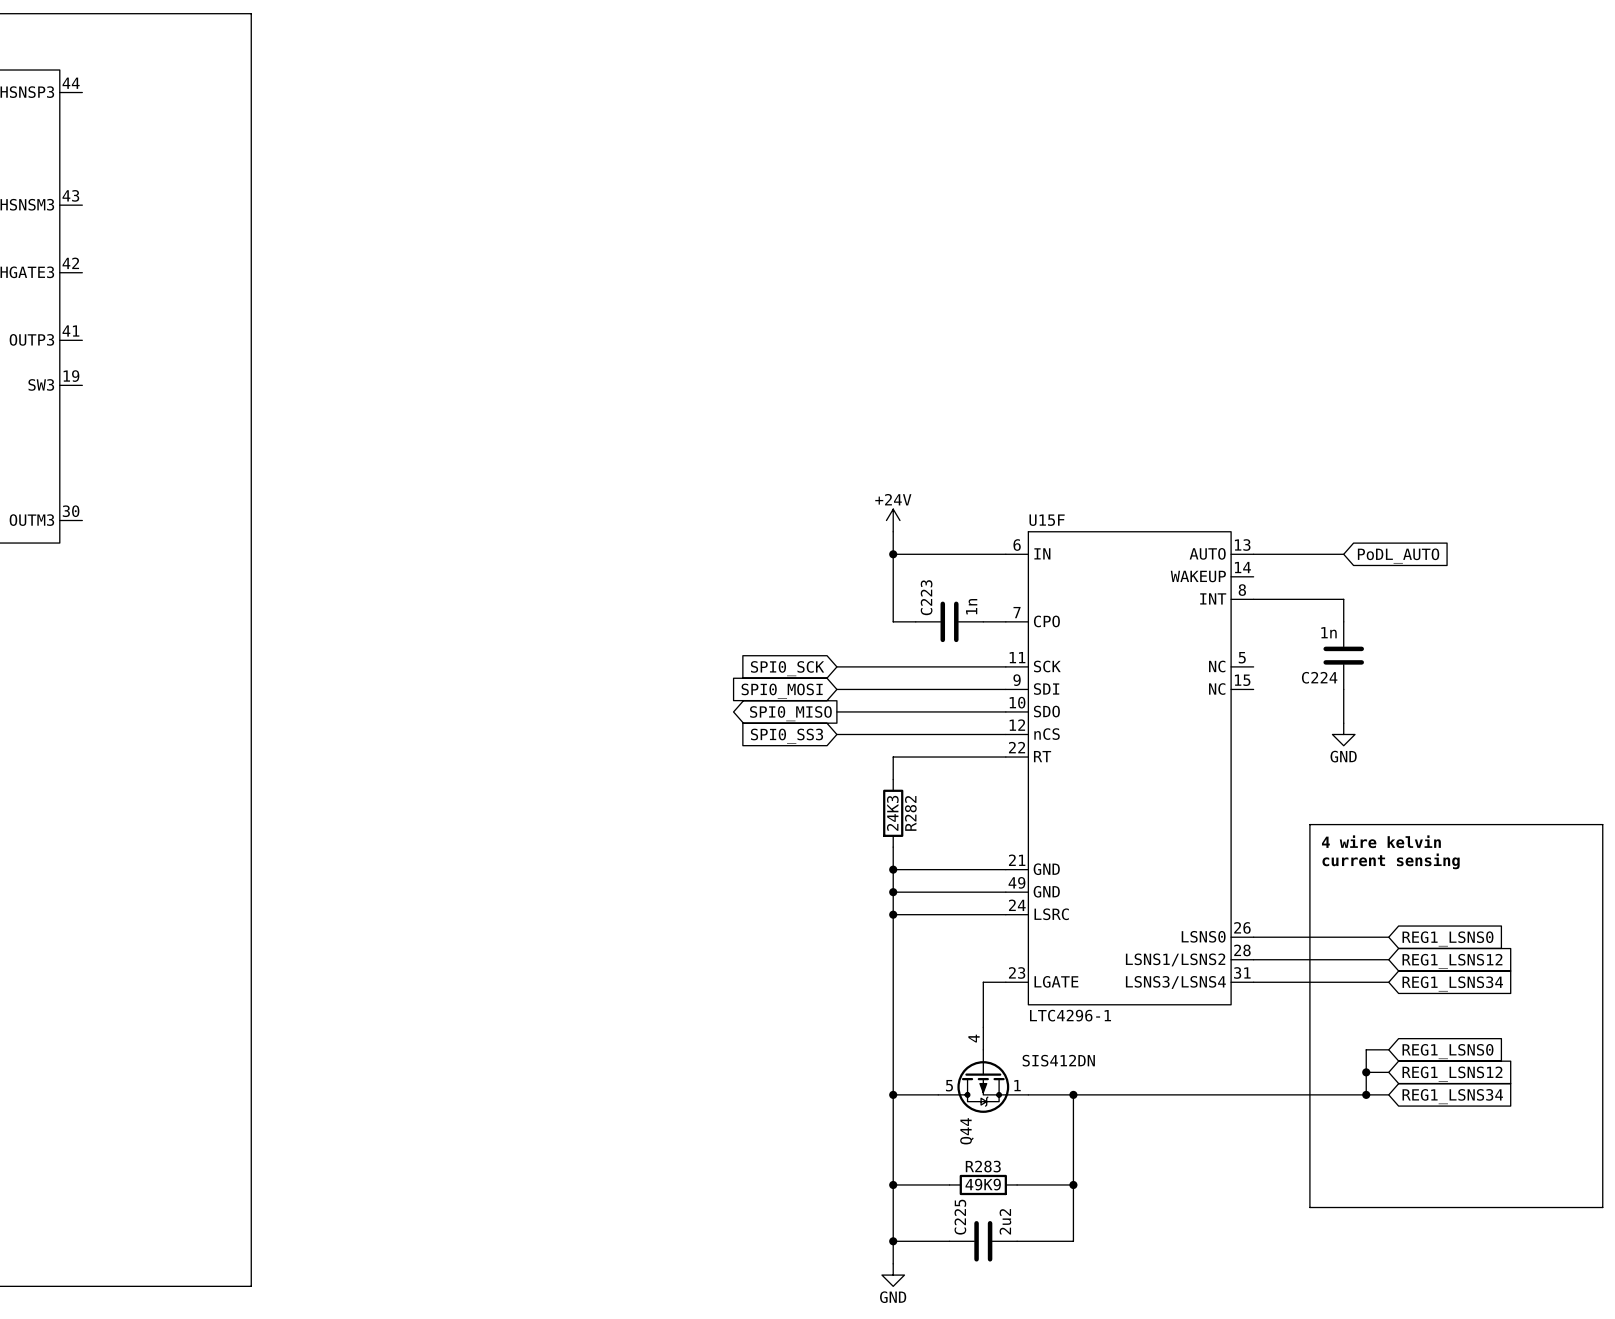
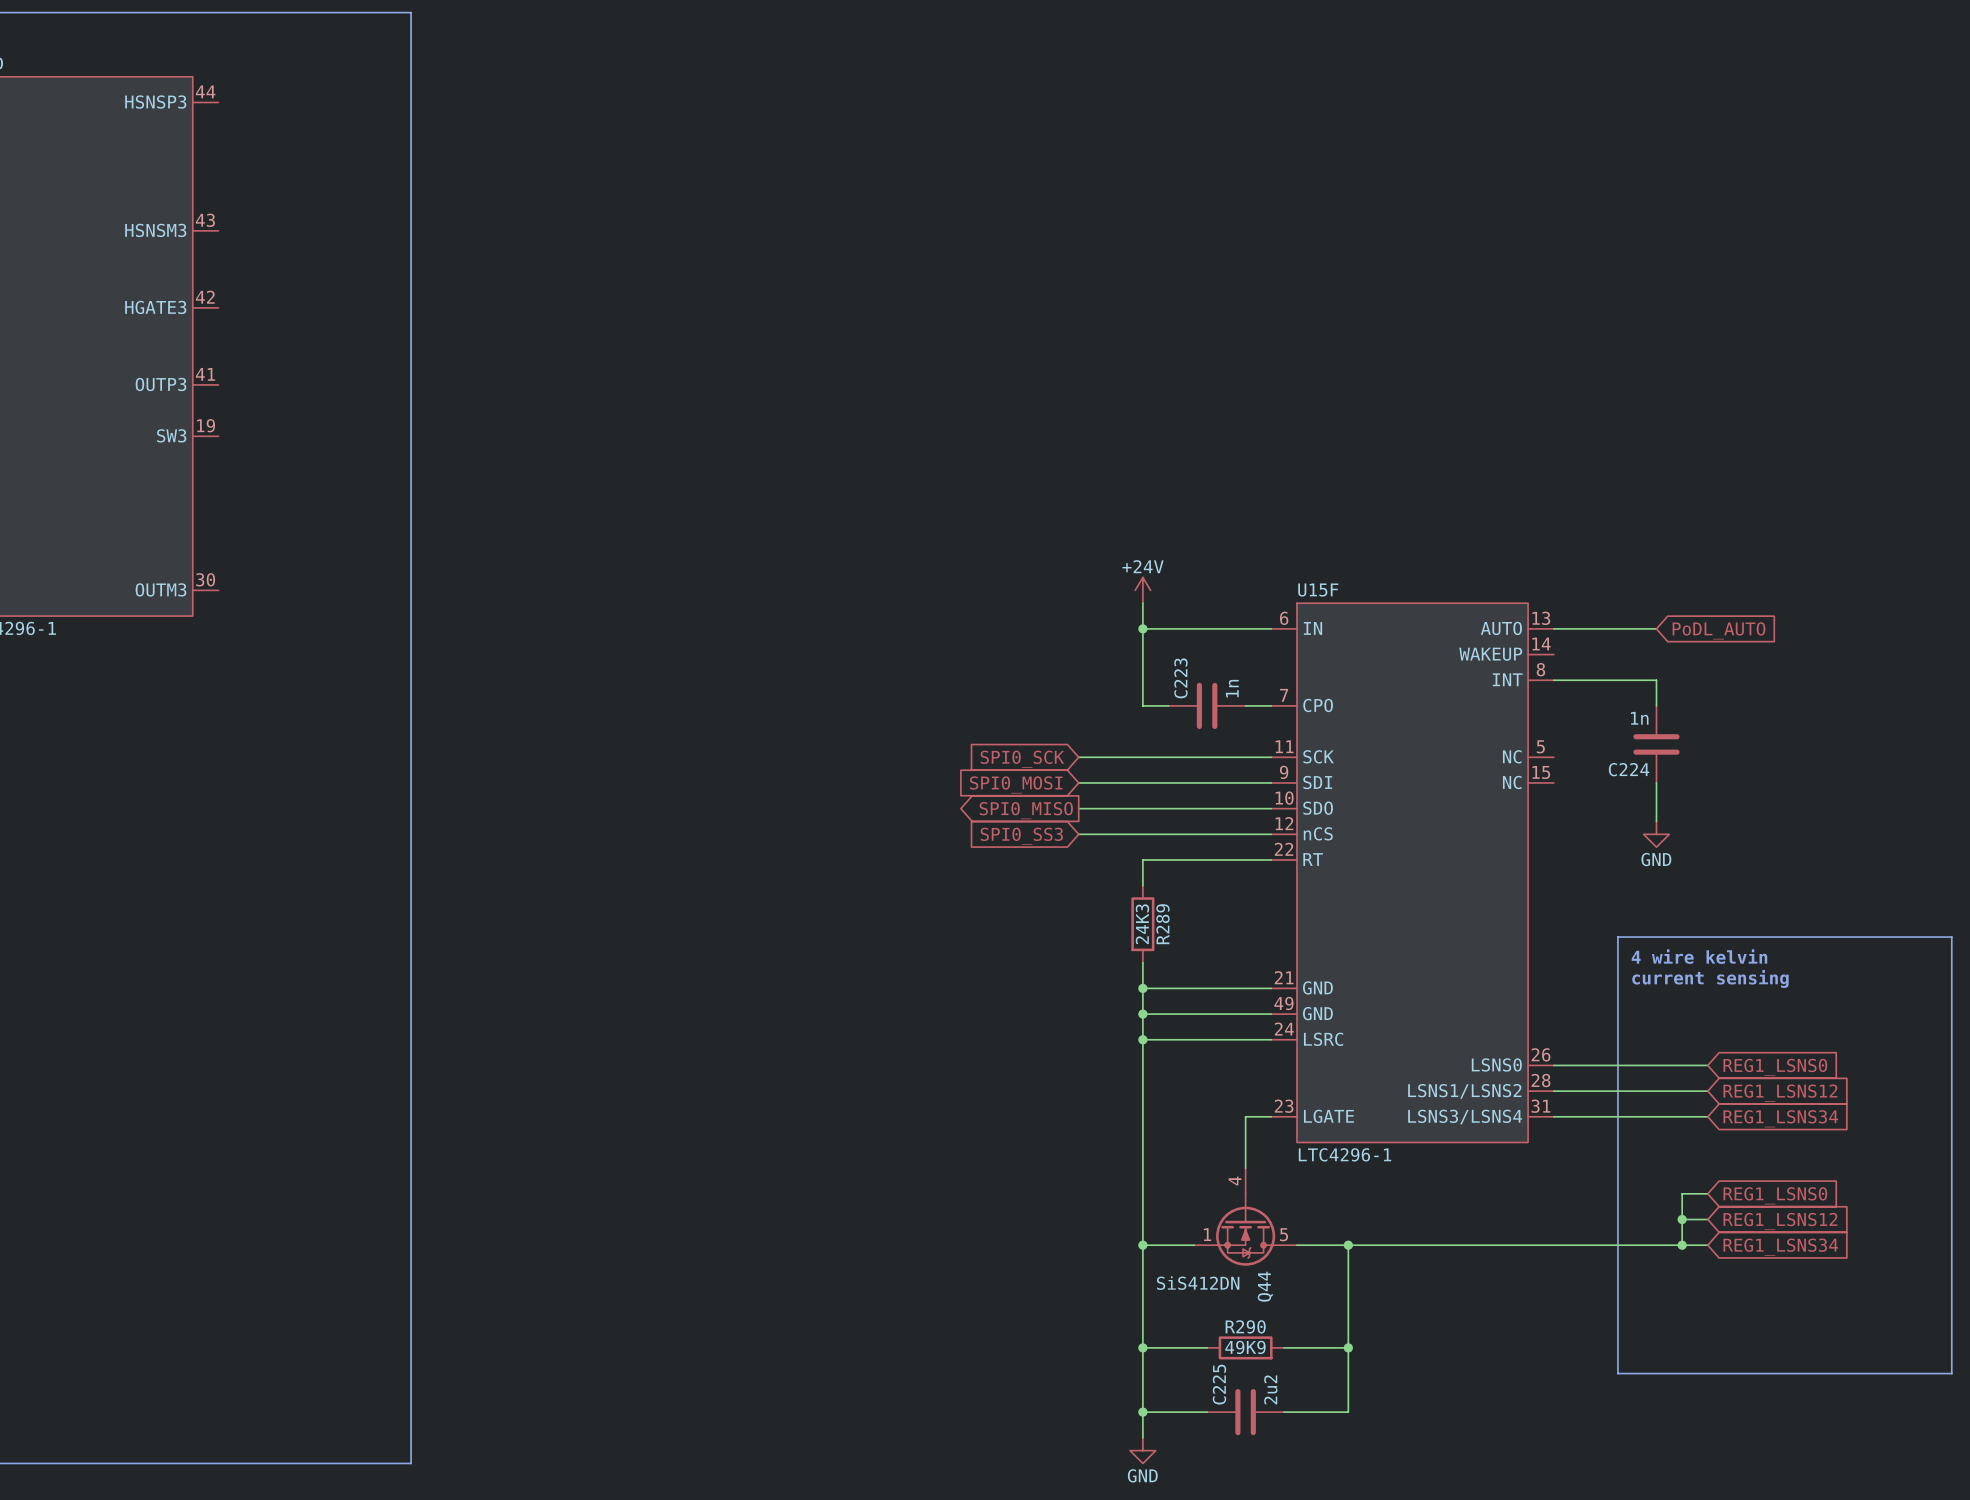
R282 name: R282 (910, 813) -> R289 (1162, 924)
Q44 symbol: [938, 1027, 1029, 1113] -> [1194, 1168, 1297, 1266]
Q44 value: SIS412DN (1058, 1060) -> SiS412DN (1198, 1283)
Q44 name position: Q44 (966, 1131) -> Q44 (1265, 1286)
R283 name: R283 (983, 1166) -> R290 (1245, 1326)

